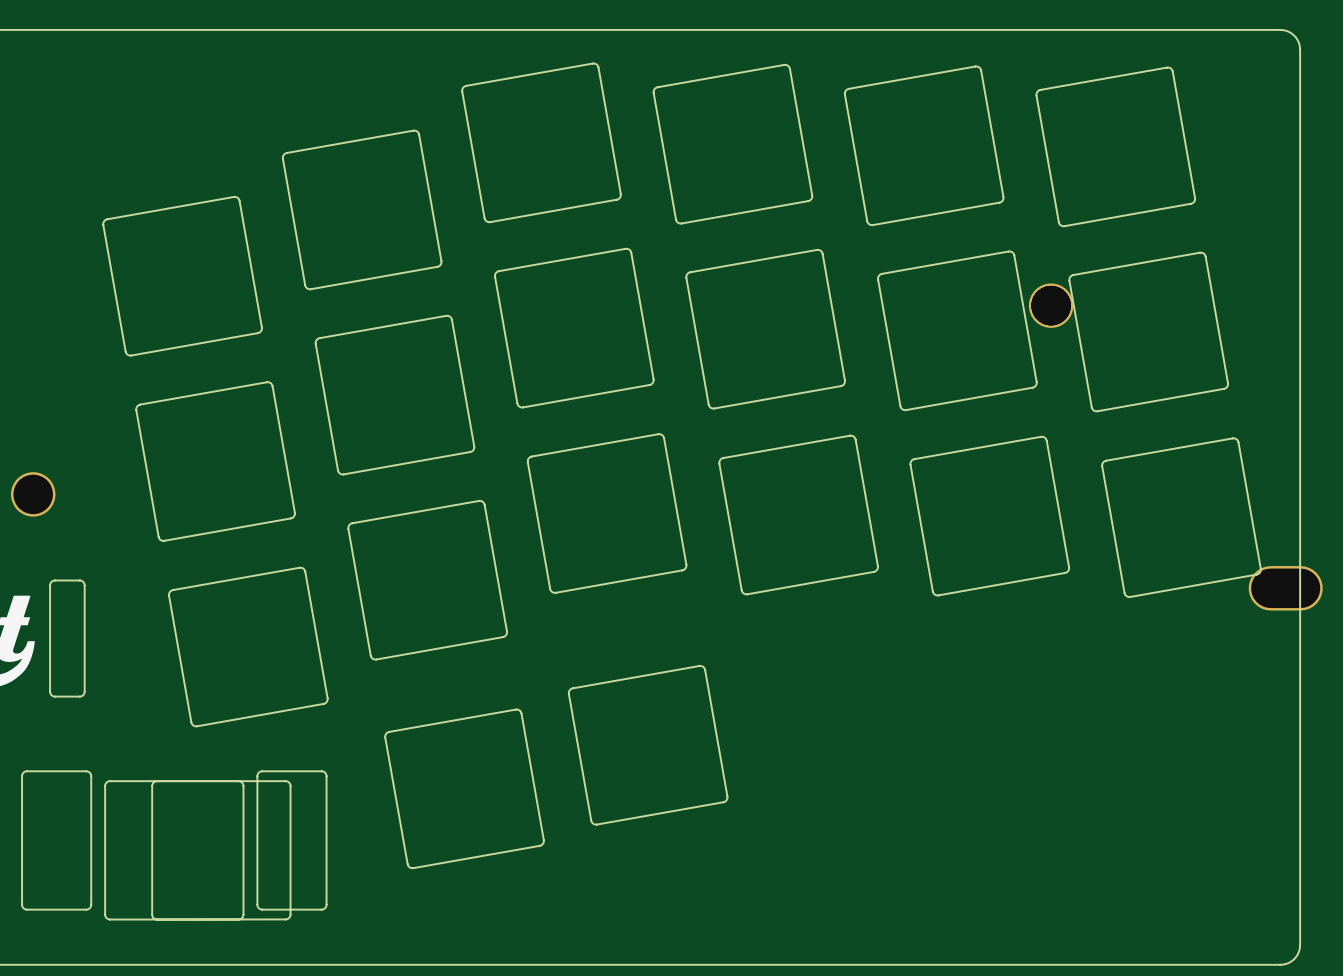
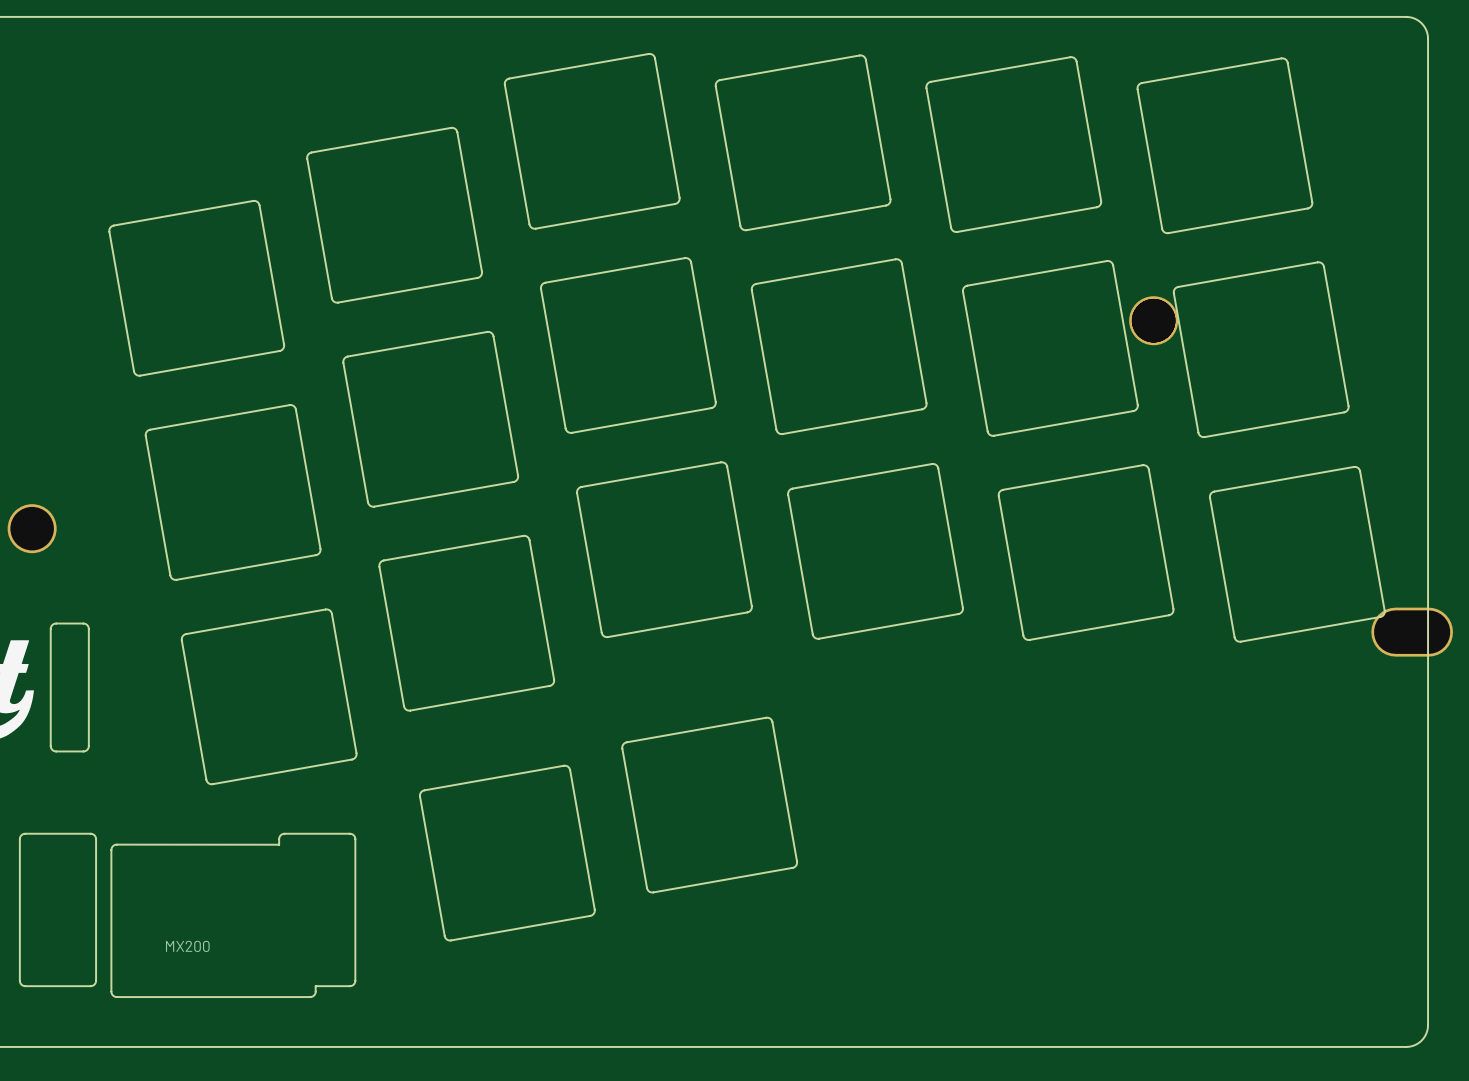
drawing shape: [22, 771, 327, 920] -> [19, 833, 356, 998]
drawing: [152, 781, 291, 920] -> none

